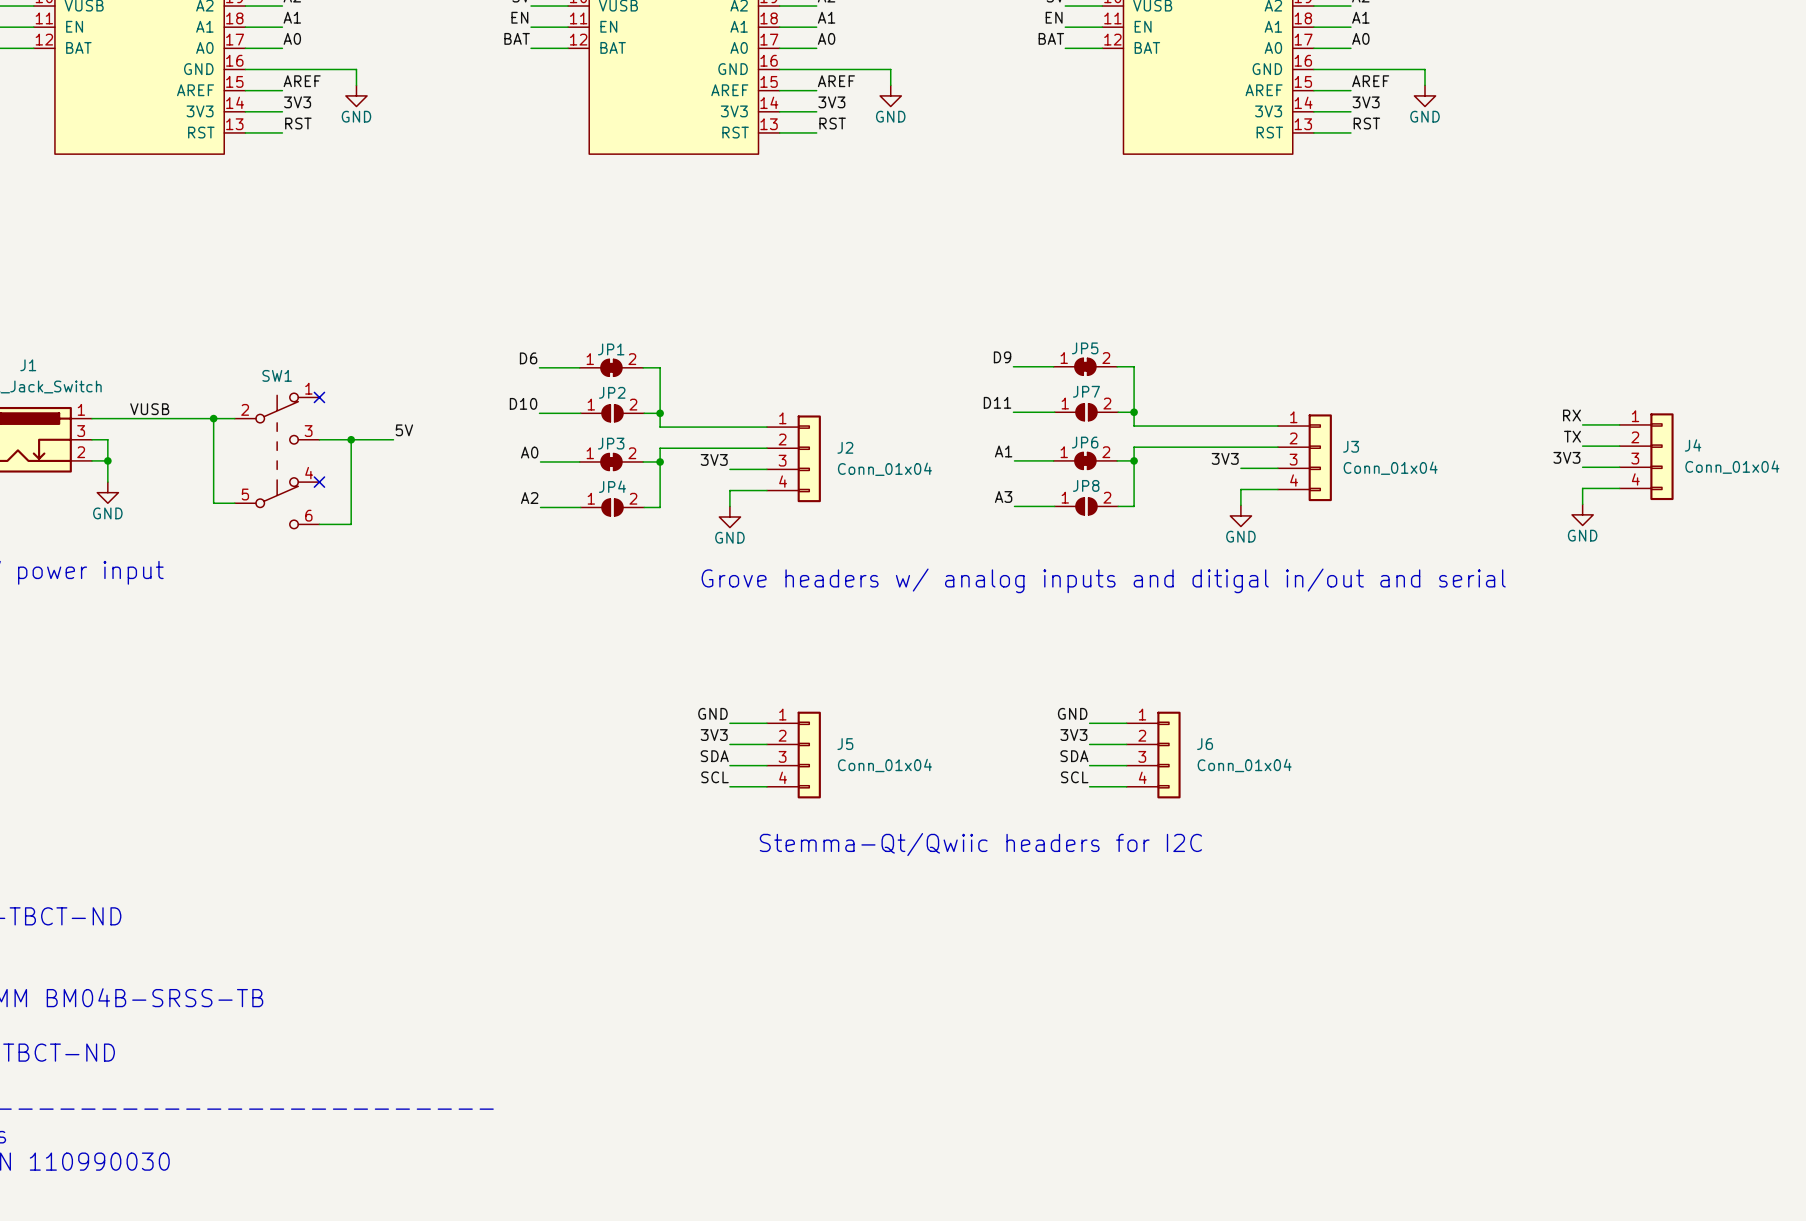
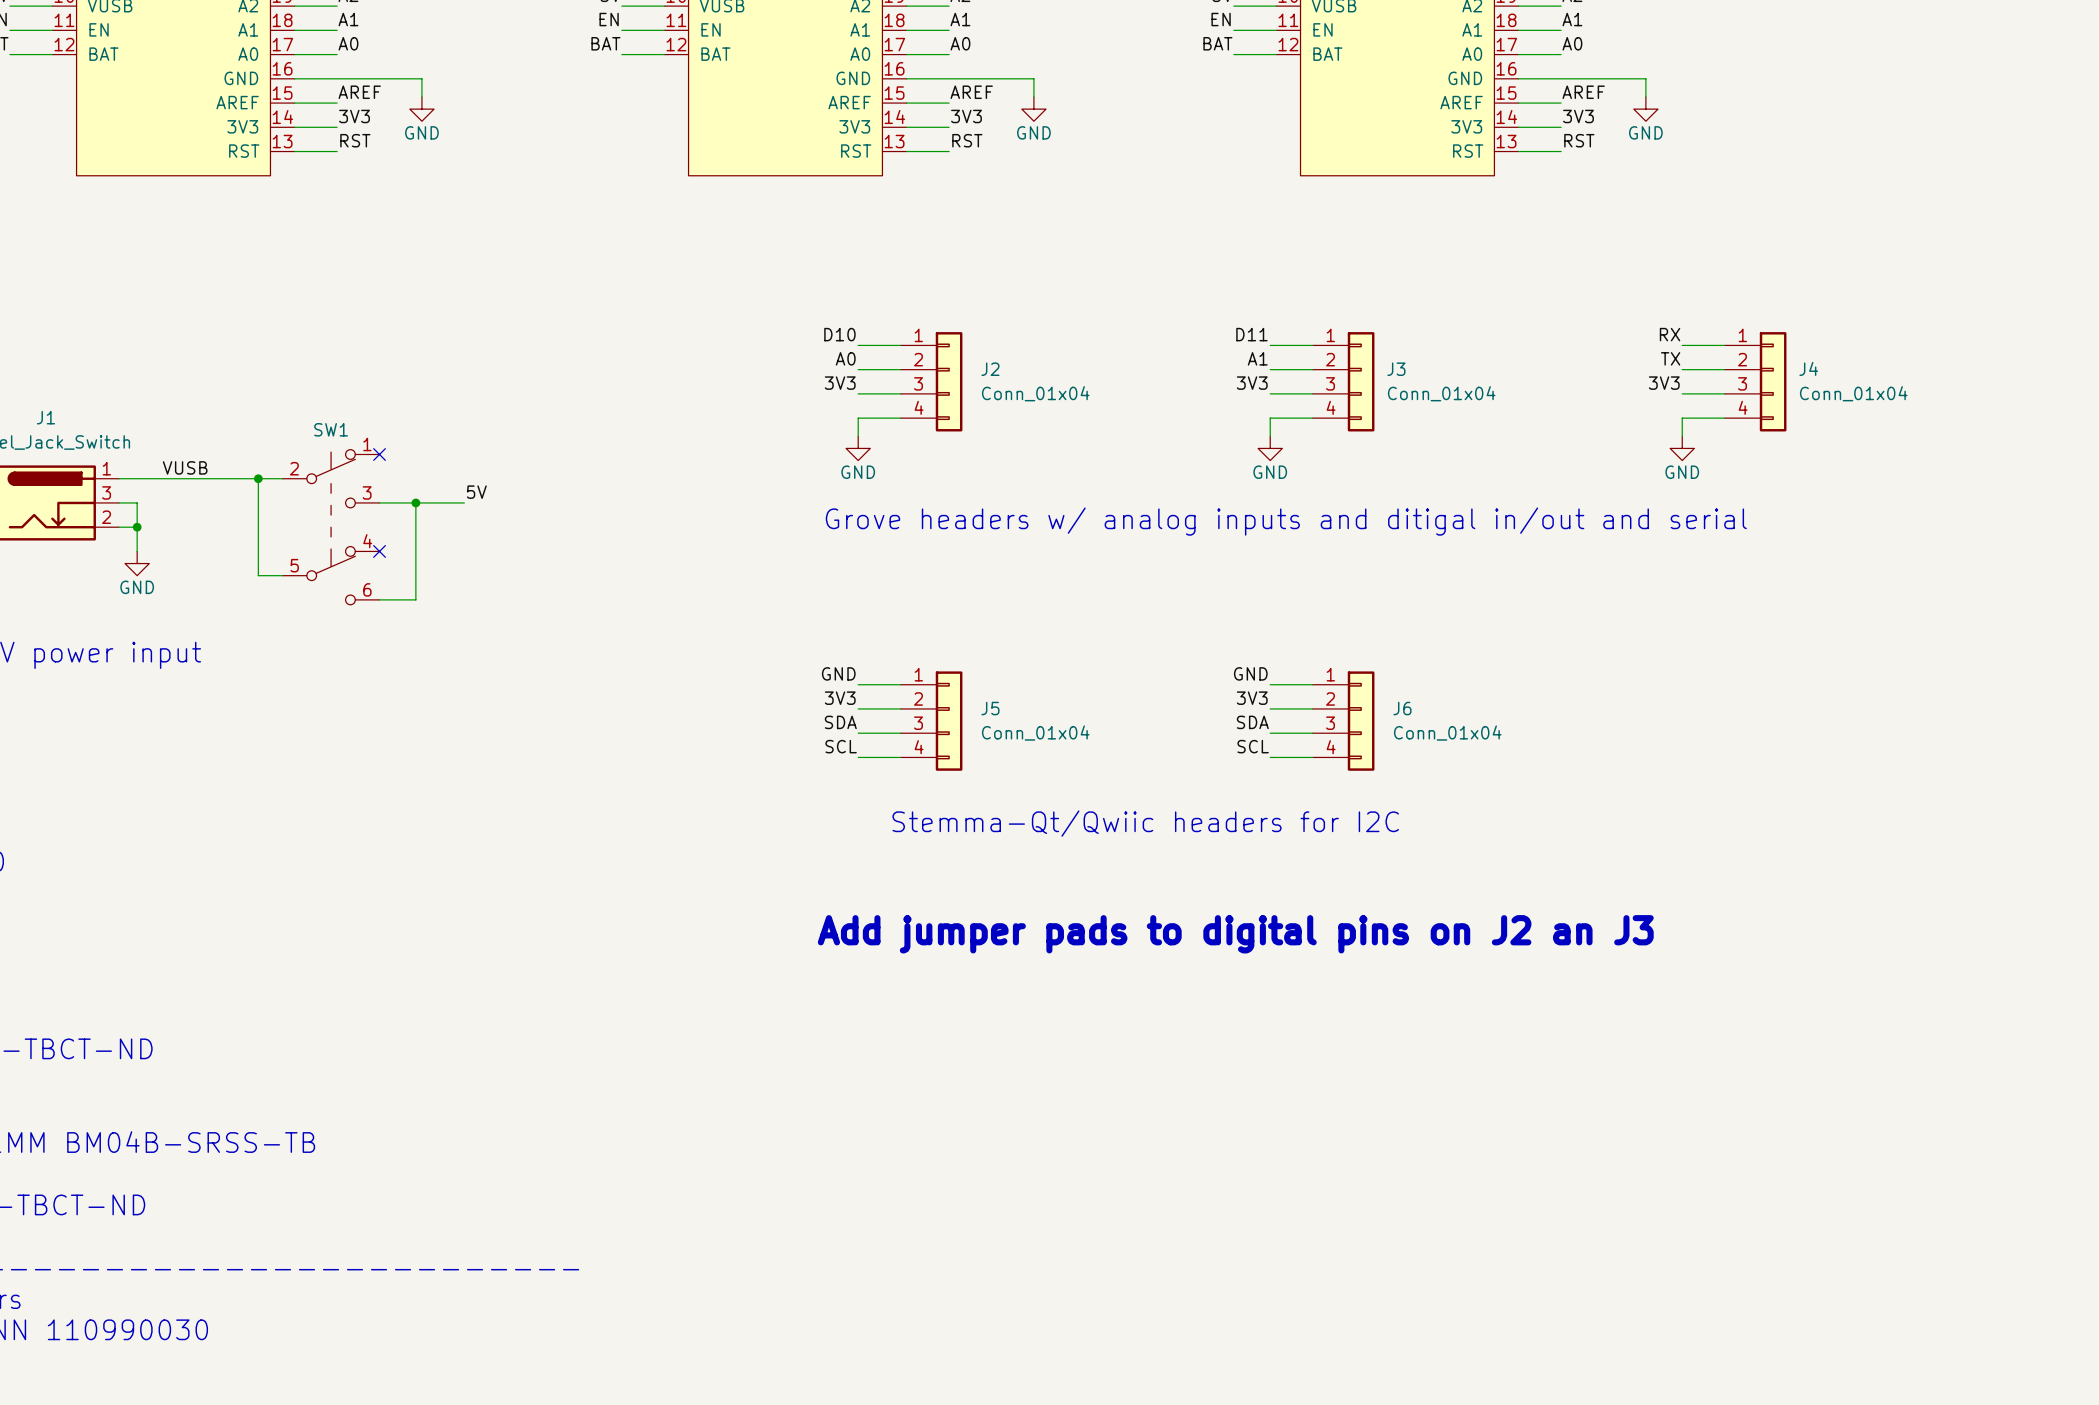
label: none -> D10 (839, 334)
wire: none -> (858, 345) (900, 345)
wire: none -> (1270, 345) (1312, 345)
label: none -> A0 (845, 358)
wire: none -> (858, 369) (900, 369)
wire: none -> (1270, 369) (1312, 369)
label: none -> 3V3 (840, 383)
label: none -> 3V3 (1252, 383)
label: none -> 3V3 (1664, 383)
label: D9 (1002, 357) -> none
label: D6 (528, 358) -> none
wire: (1013, 366) (1053, 366) -> none
JP5: (1085, 366) -> none
wire: (1117, 366) (1134, 366) (1134, 426) (1277, 426) -> none
wire: (539, 367) (579, 367) -> none
JP1: (611, 367) -> none
wire: (643, 367) (660, 367) (660, 427) (766, 427) -> none
power symbol: none -> GND (1270, 448)
power symbol: none -> GND (1682, 448)
label position: D11 (997, 402) -> D11 (1251, 334)
label: D10 (523, 403) -> none
wire: (1013, 412) (1054, 412) -> none
JP7: (1086, 412) -> none
wire: (1118, 412) (1134, 412) -> none
junction: (1134, 412) -> none
wire: (539, 413) (580, 413) -> none
JP2: (612, 413) -> none
wire: (644, 413) (660, 413) -> none
junction: (660, 413) -> none
label position: RX (1571, 415) -> RX (1670, 334)
wire: (1582, 424) (1619, 424) -> (1682, 345) (1724, 345)
label position: TX (1572, 436) -> TX (1670, 358)
wire: (1582, 446) (1619, 446) -> (1682, 369) (1724, 369)
wire: (1277, 447) (1134, 447) (1134, 506) (1118, 506) -> none
wire: (766, 448) (660, 448) (660, 507) (644, 507) -> none
label position: A1 (1003, 451) -> A1 (1257, 358)
label: A0 (529, 452) -> none
J4 position: (1646, 456) -> (1755, 381)
J3 position: (1304, 457) -> (1343, 381)
label: 3V3 (1566, 457) -> none
J2 position: (793, 458) -> (931, 381)
label: 3V3 (1225, 458) -> none
label: 3V3 (714, 459) -> none
wire: (1014, 460) (1053, 460) -> none
JP6: (1085, 460) -> none
wire: (1117, 460) (1134, 460) -> none
junction: (1134, 460) -> none
wire: (540, 461) (579, 461) -> none
JP3: (611, 461) -> none
wire: (643, 461) (660, 461) -> none
junction: (660, 461) -> none
wire: (1582, 467) (1619, 467) -> (1682, 393) (1724, 393)
wire: (1240, 468) (1277, 468) -> (1270, 393) (1312, 393)
wire: (729, 469) (766, 469) -> (858, 393) (900, 393)
wire: (1619, 488) (1582, 488) (1582, 504) -> (1724, 418) (1682, 418) (1682, 436)
wire: (1277, 489) (1240, 489) (1240, 505) -> (1312, 418) (1270, 418) (1270, 436)
wire: (766, 490) (729, 490) (729, 506) -> (900, 418) (858, 418) (858, 436)
label: A3 (1003, 496) -> none
label: A2 (529, 498) -> none
wire: (1014, 506) (1054, 506) -> none
JP8: (1086, 506) -> none
wire: (540, 507) (580, 507) -> none
JP4: (612, 507) -> none
power symbol: GND (1582, 514) -> none
power symbol: GND (1240, 515) -> none
power symbol position: GND (729, 517) -> GND (858, 448)
text position: Grove headers w/ analog inputs and ditigal in/out and serial (1103, 580) -> Grove headers w/ analog inputs and ditigal in/out and serial (1286, 521)
label: none -> 3V3 (840, 698)
label: none -> 3V3 (1252, 698)
label position: GND (712, 713) -> GND (838, 673)
label position: GND (1072, 713) -> GND (1250, 673)
wire: (729, 723) (766, 723) -> (858, 684) (900, 684)
wire: (1089, 723) (1126, 723) -> (1270, 684) (1312, 684)
label: 3V3 (714, 735) -> none
label: 3V3 (1073, 735) -> none
wire: (729, 744) (766, 744) -> (858, 708) (900, 708)
wire: (1089, 744) (1126, 744) -> (1270, 708) (1312, 708)
J5 position: (793, 755) -> (931, 721)
J6 position: (1153, 755) -> (1343, 721)
label position: SDA (714, 756) -> SDA (840, 722)
label position: SDA (1074, 756) -> SDA (1252, 722)
wire: (729, 765) (766, 765) -> (858, 733) (900, 733)
wire: (1089, 765) (1126, 765) -> (1270, 733) (1312, 733)
label position: SCL (714, 777) -> SCL (841, 746)
label position: SCL (1074, 777) -> SCL (1253, 746)
wire: (729, 786) (766, 786) -> (858, 757) (900, 757)
wire: (1089, 786) (1126, 786) -> (1270, 757) (1312, 757)
text: none -> Add jumper pads to digital pins on J2 an J3 (1235, 934)
text position: Stemma-Qt/Qwiic headers for I2C (980, 844) -> Stemma-Qt/Qwiic headers for I2C (1145, 823)

